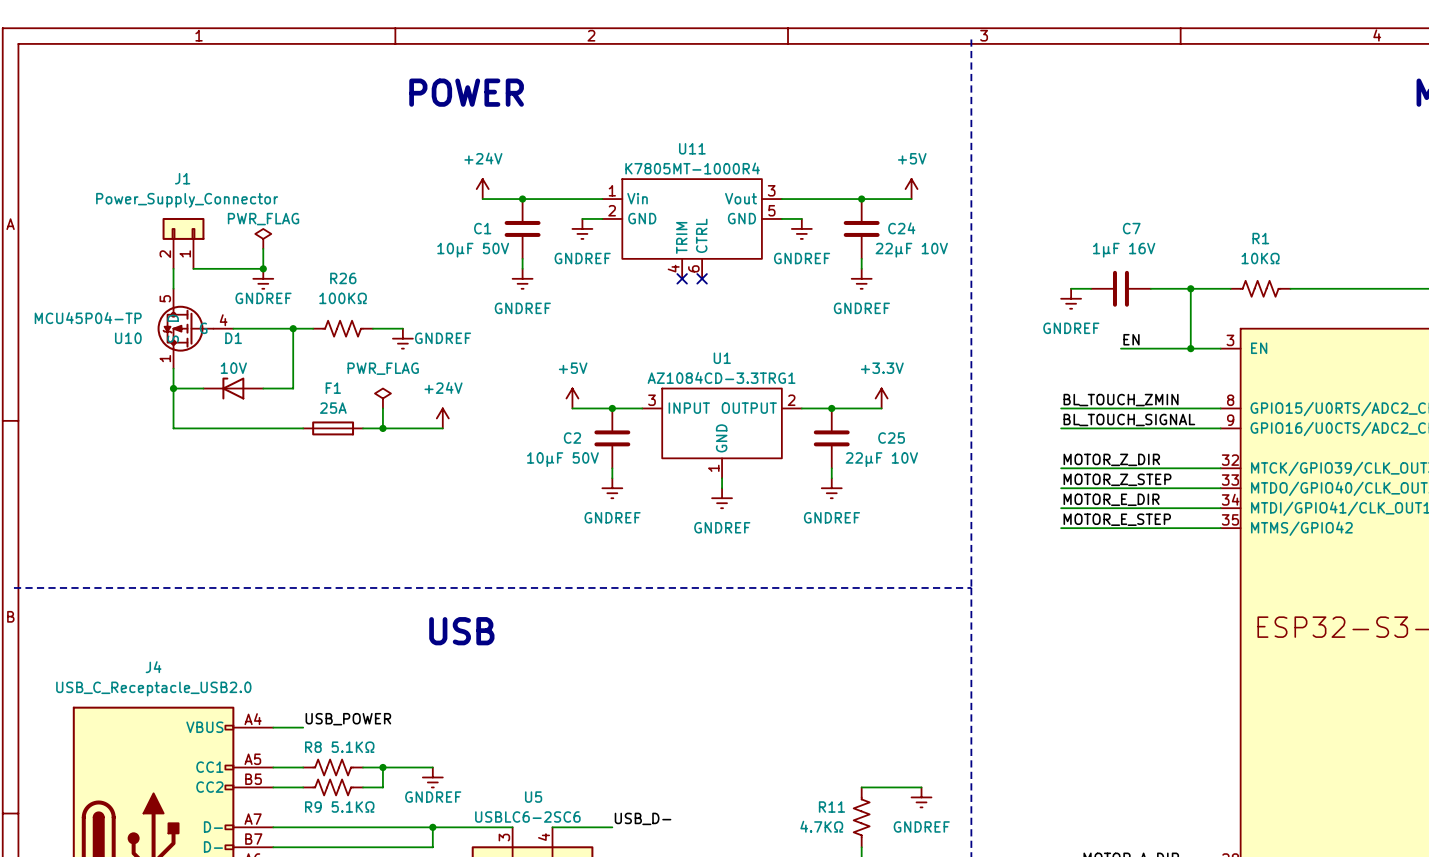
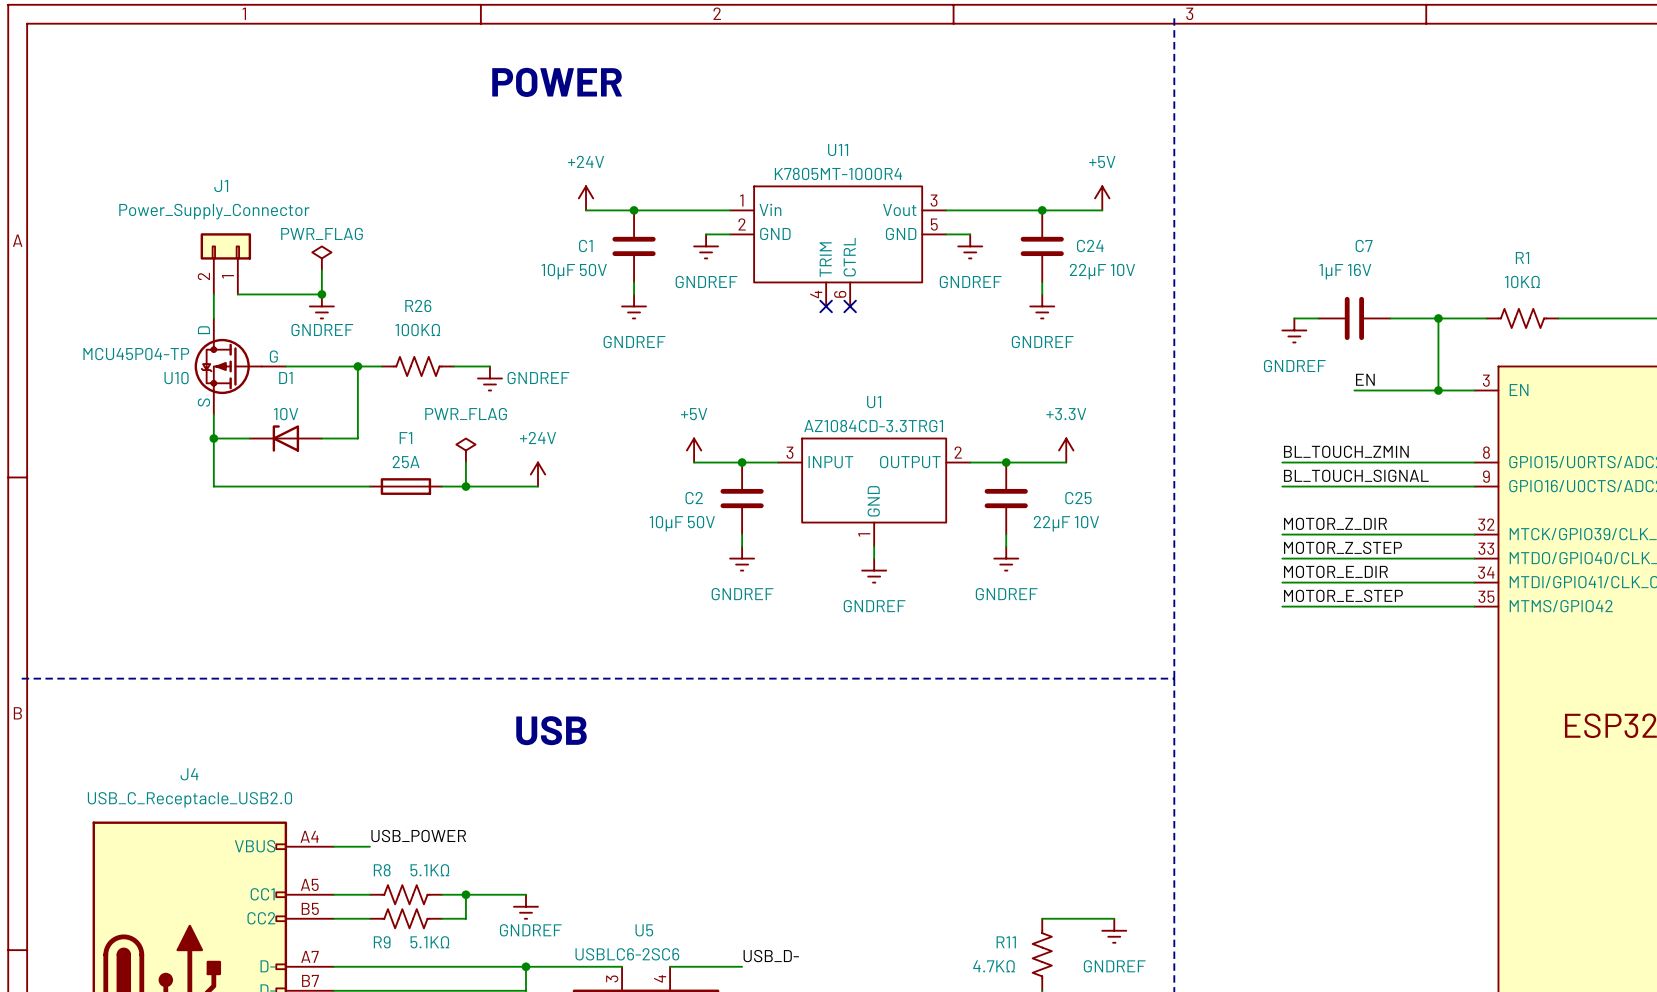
U10 symbol: [157, 288, 234, 369] -> [194, 318, 286, 415]

